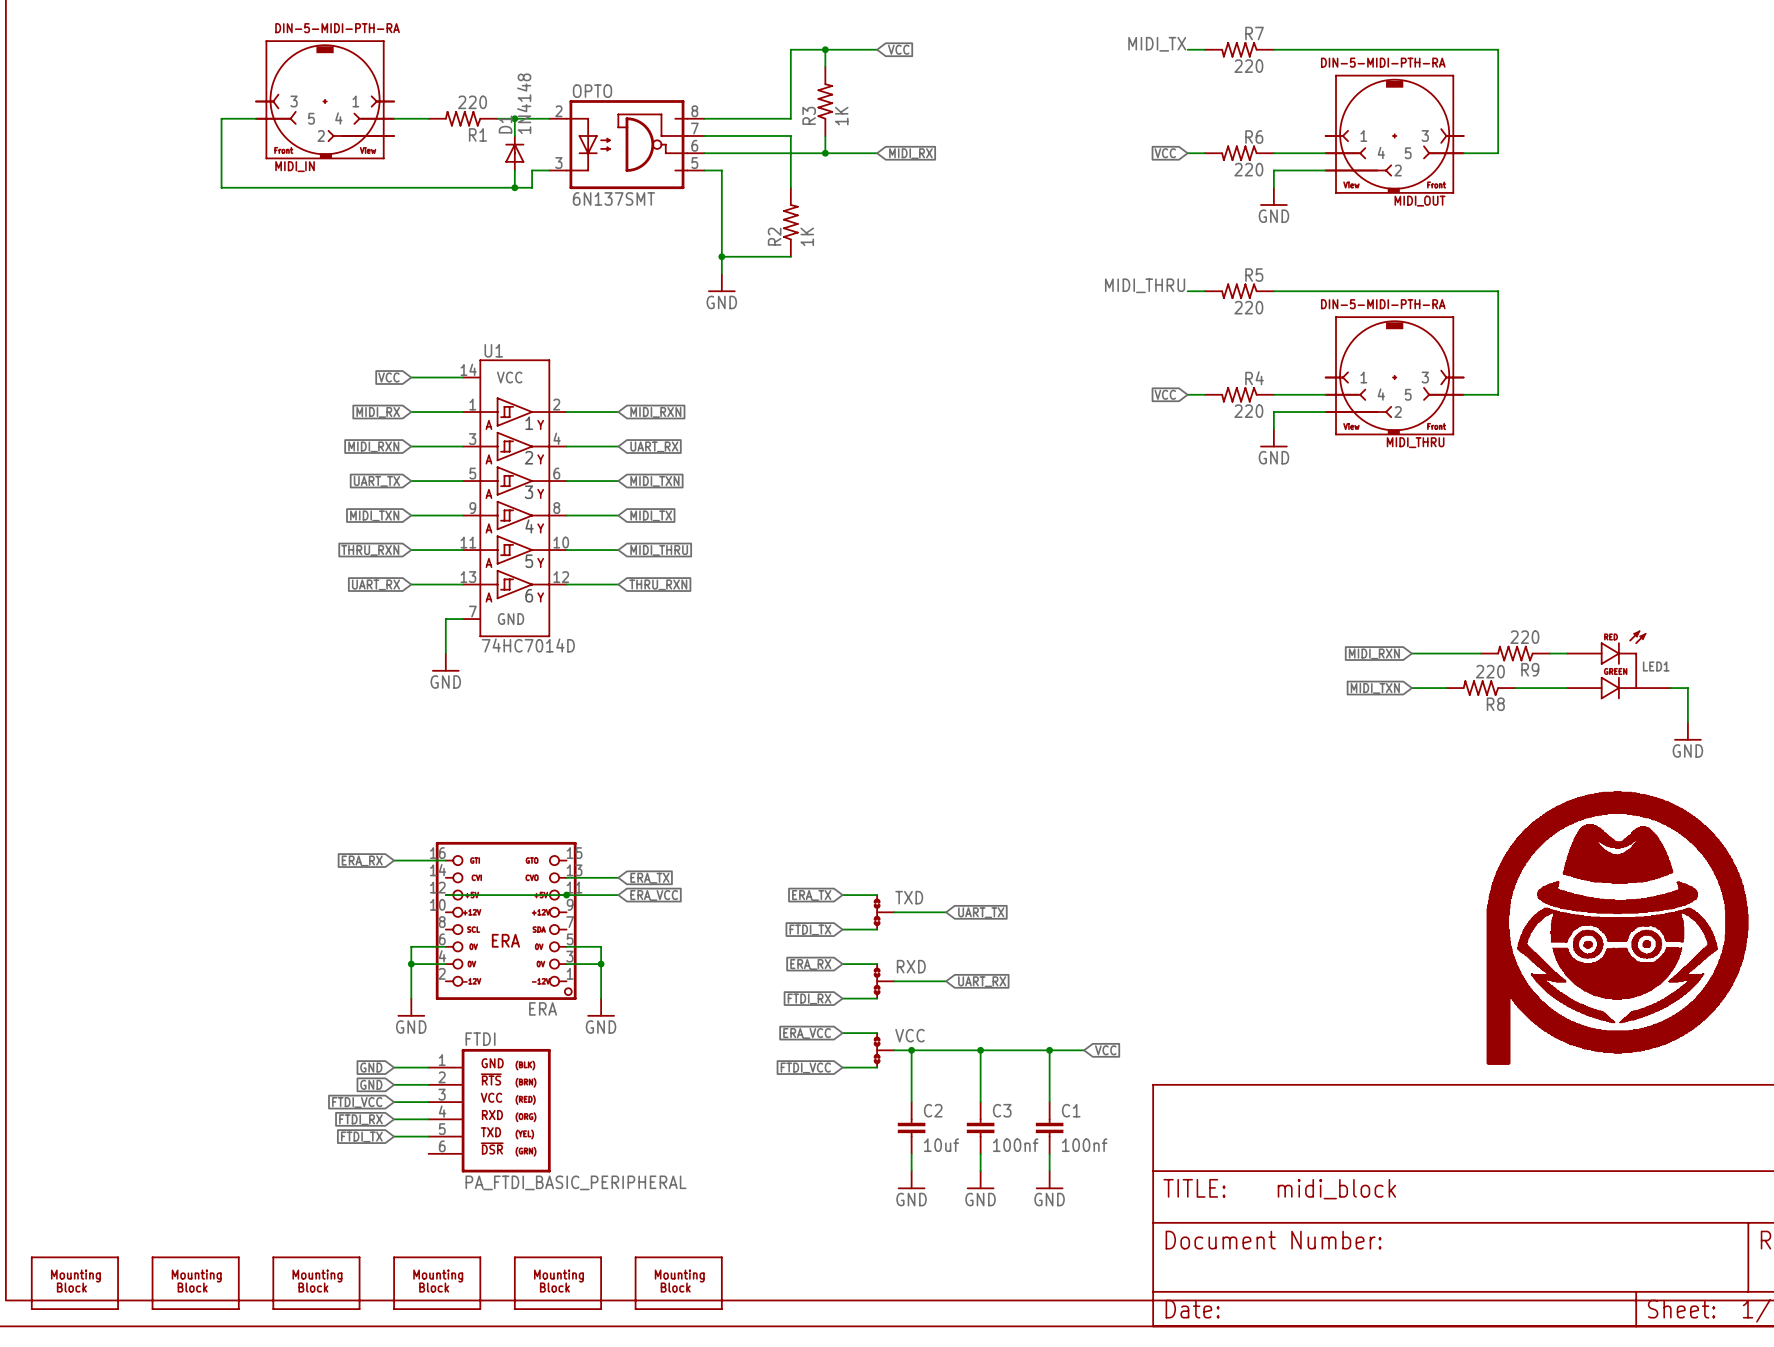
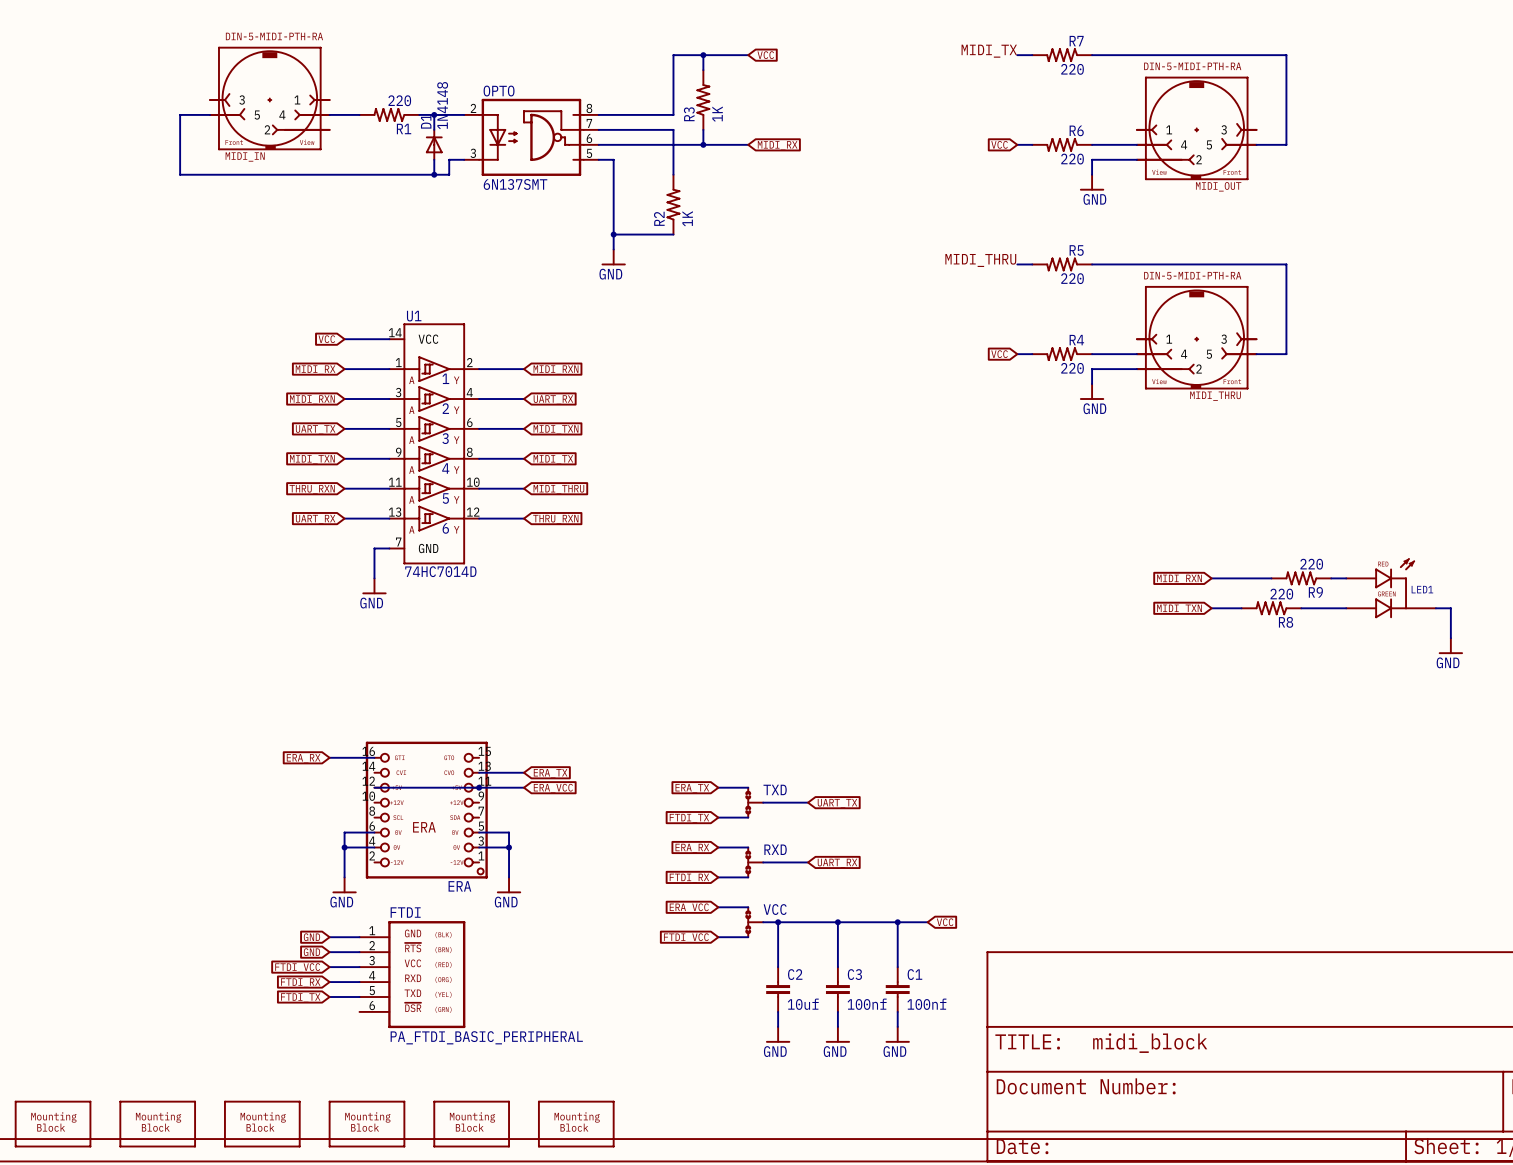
part: (1617, 927) -> none

